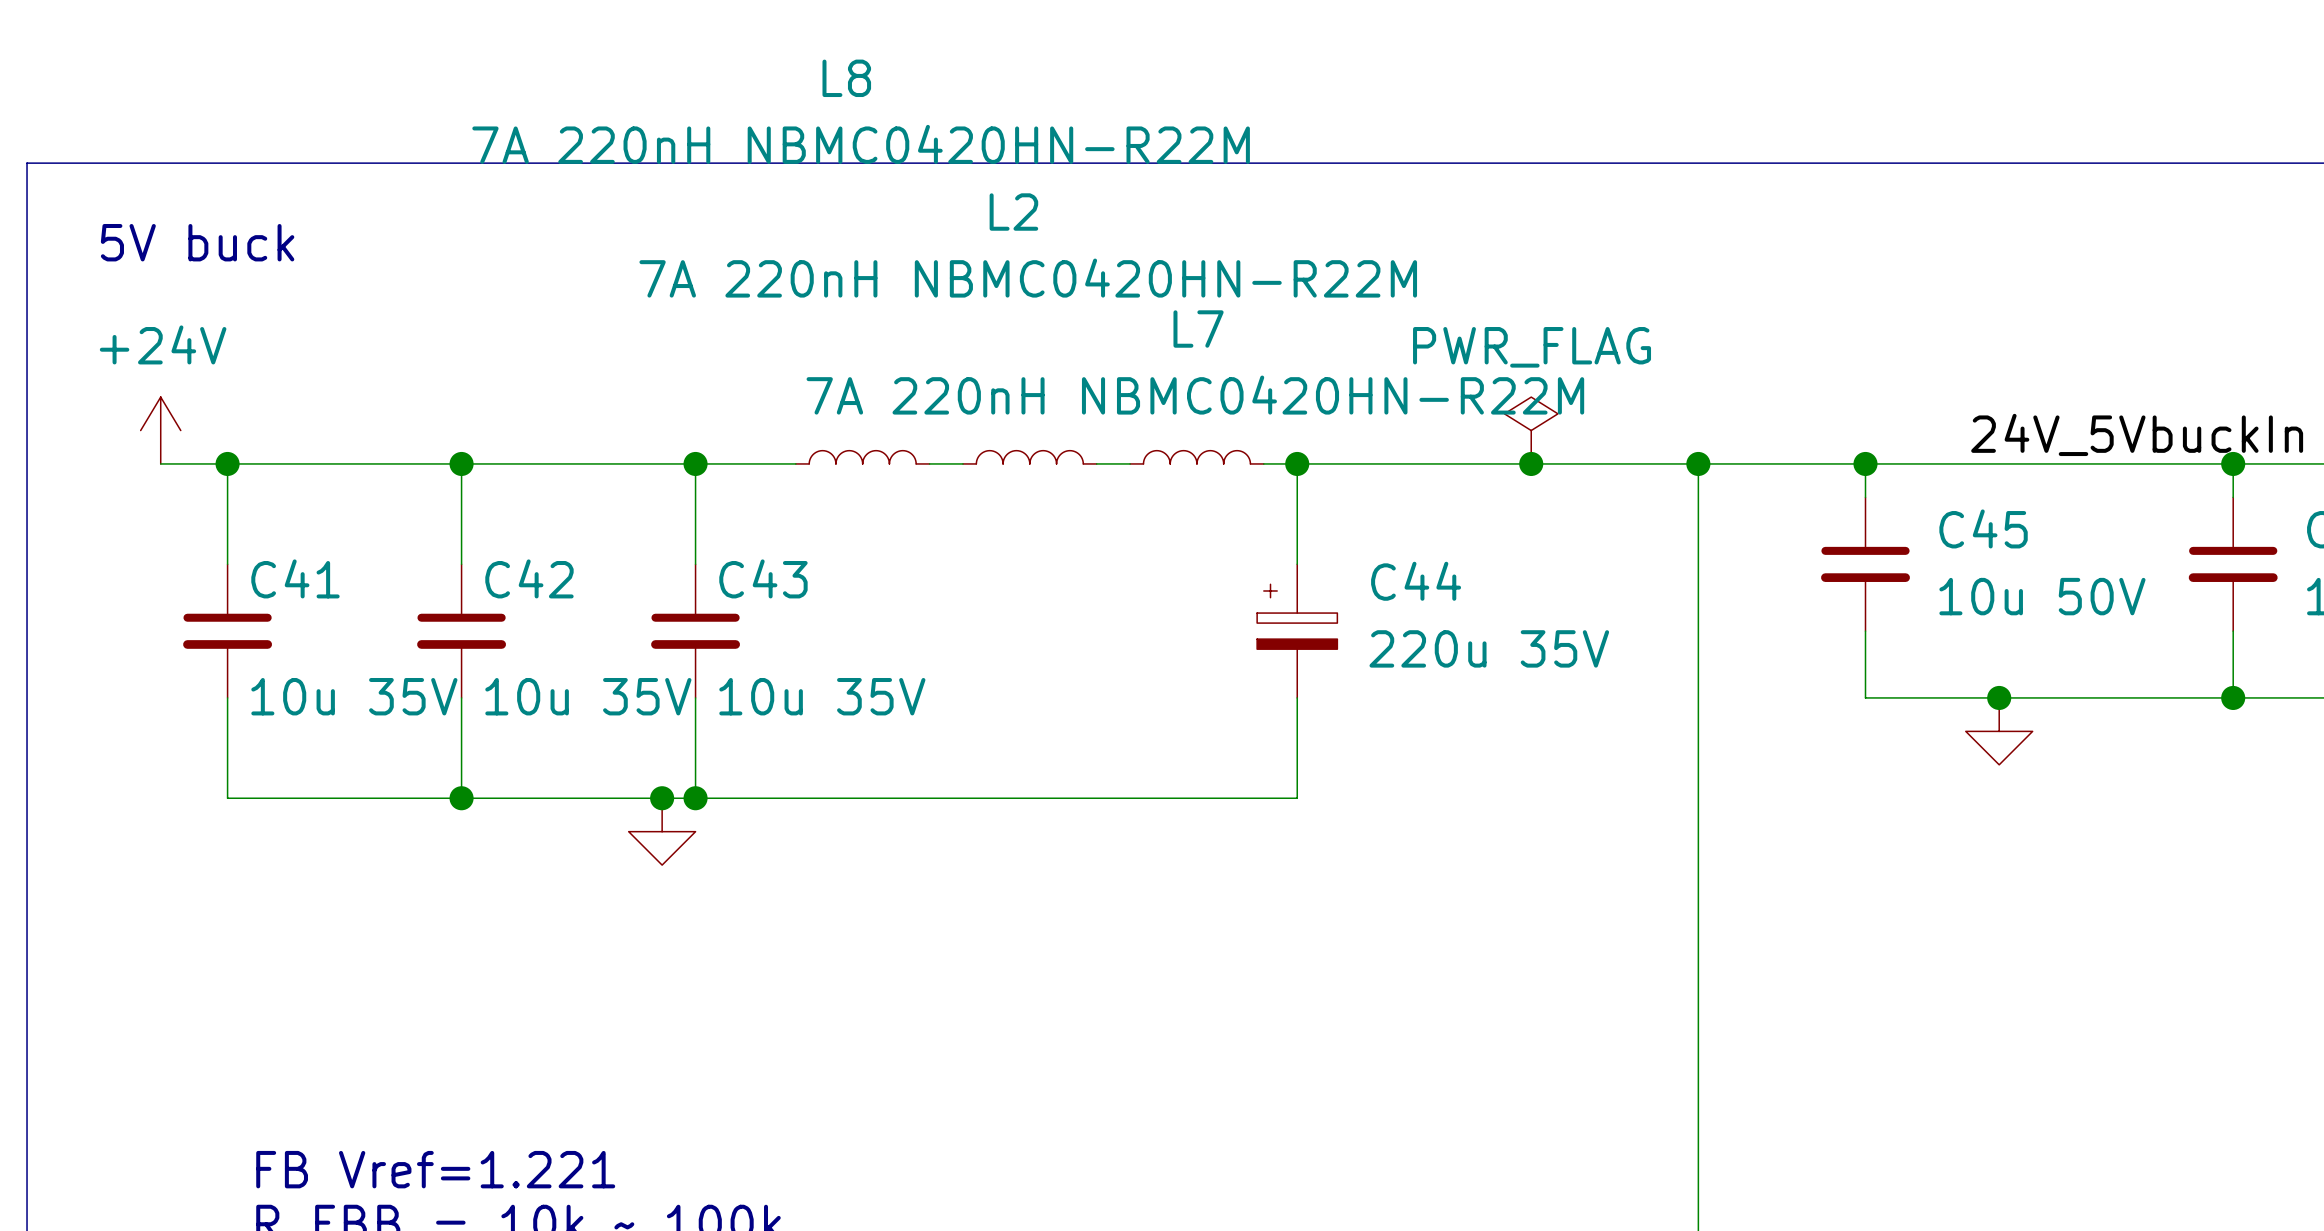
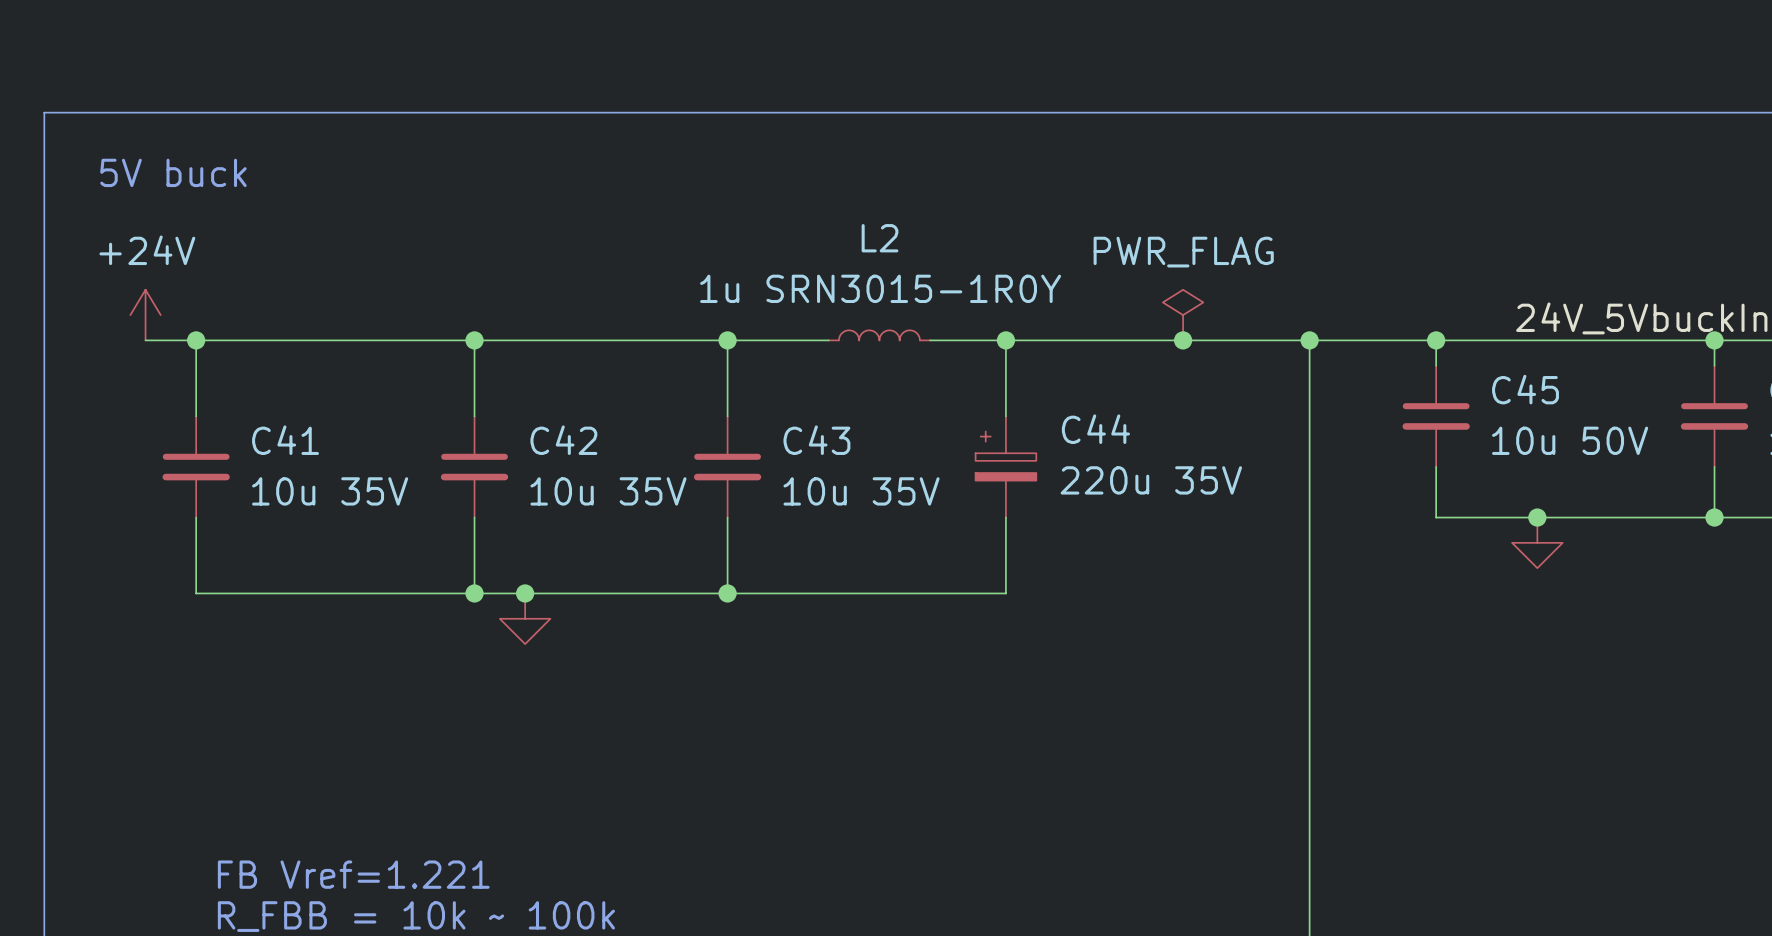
L2 name position: L2 (1013, 212) -> L2 (880, 238)
L2 value: 7A 220nH NBMC0420HN-R22M (1028, 278) -> 1u SRN3015-1R0Y (880, 288)
L8: 7A 220nH NBMC0420HN-R22M (862, 457) -> none
L2 position: (1029, 457) -> (879, 335)
L7: 7A 220nH NBMC0420HN-R22M (1196, 457) -> none
wire: (461, 463) (461, 564) -> none
junction: (461, 463) -> none
junction: none -> (474, 340)
wire: (695, 463) (695, 564) -> (474, 340) (474, 416)
junction: (695, 463) -> none
wire: none -> (626, 340) (727, 340) (727, 416)
junction: none -> (727, 340)
wire: none -> (752, 340) (828, 340)
wire: (1096, 463) (1130, 463) -> none
wire: none -> (930, 340) (980, 340)
C41 name position: C41 (295, 578) -> C41 (285, 440)
C42 name position: C42 (529, 578) -> C42 (563, 440)
C43 name position: C43 (763, 578) -> C43 (816, 440)
C42 position: (461, 631) -> (474, 466)
C43 position: (695, 631) -> (727, 466)
C41 value position: 10u 35V (354, 696) -> 10u 35V (330, 491)
C42 value position: 10u 35V (588, 696) -> 10u 35V (608, 491)
C43 value position: 10u 35V (822, 696) -> 10u 35V (861, 491)
wire: (461, 697) (461, 798) -> (727, 517) (727, 593)
wire: (695, 697) (695, 798) -> (474, 517) (474, 593)
junction: (461, 798) -> none
junction: none -> (474, 593)
junction: (695, 798) -> none
junction: none -> (727, 593)

